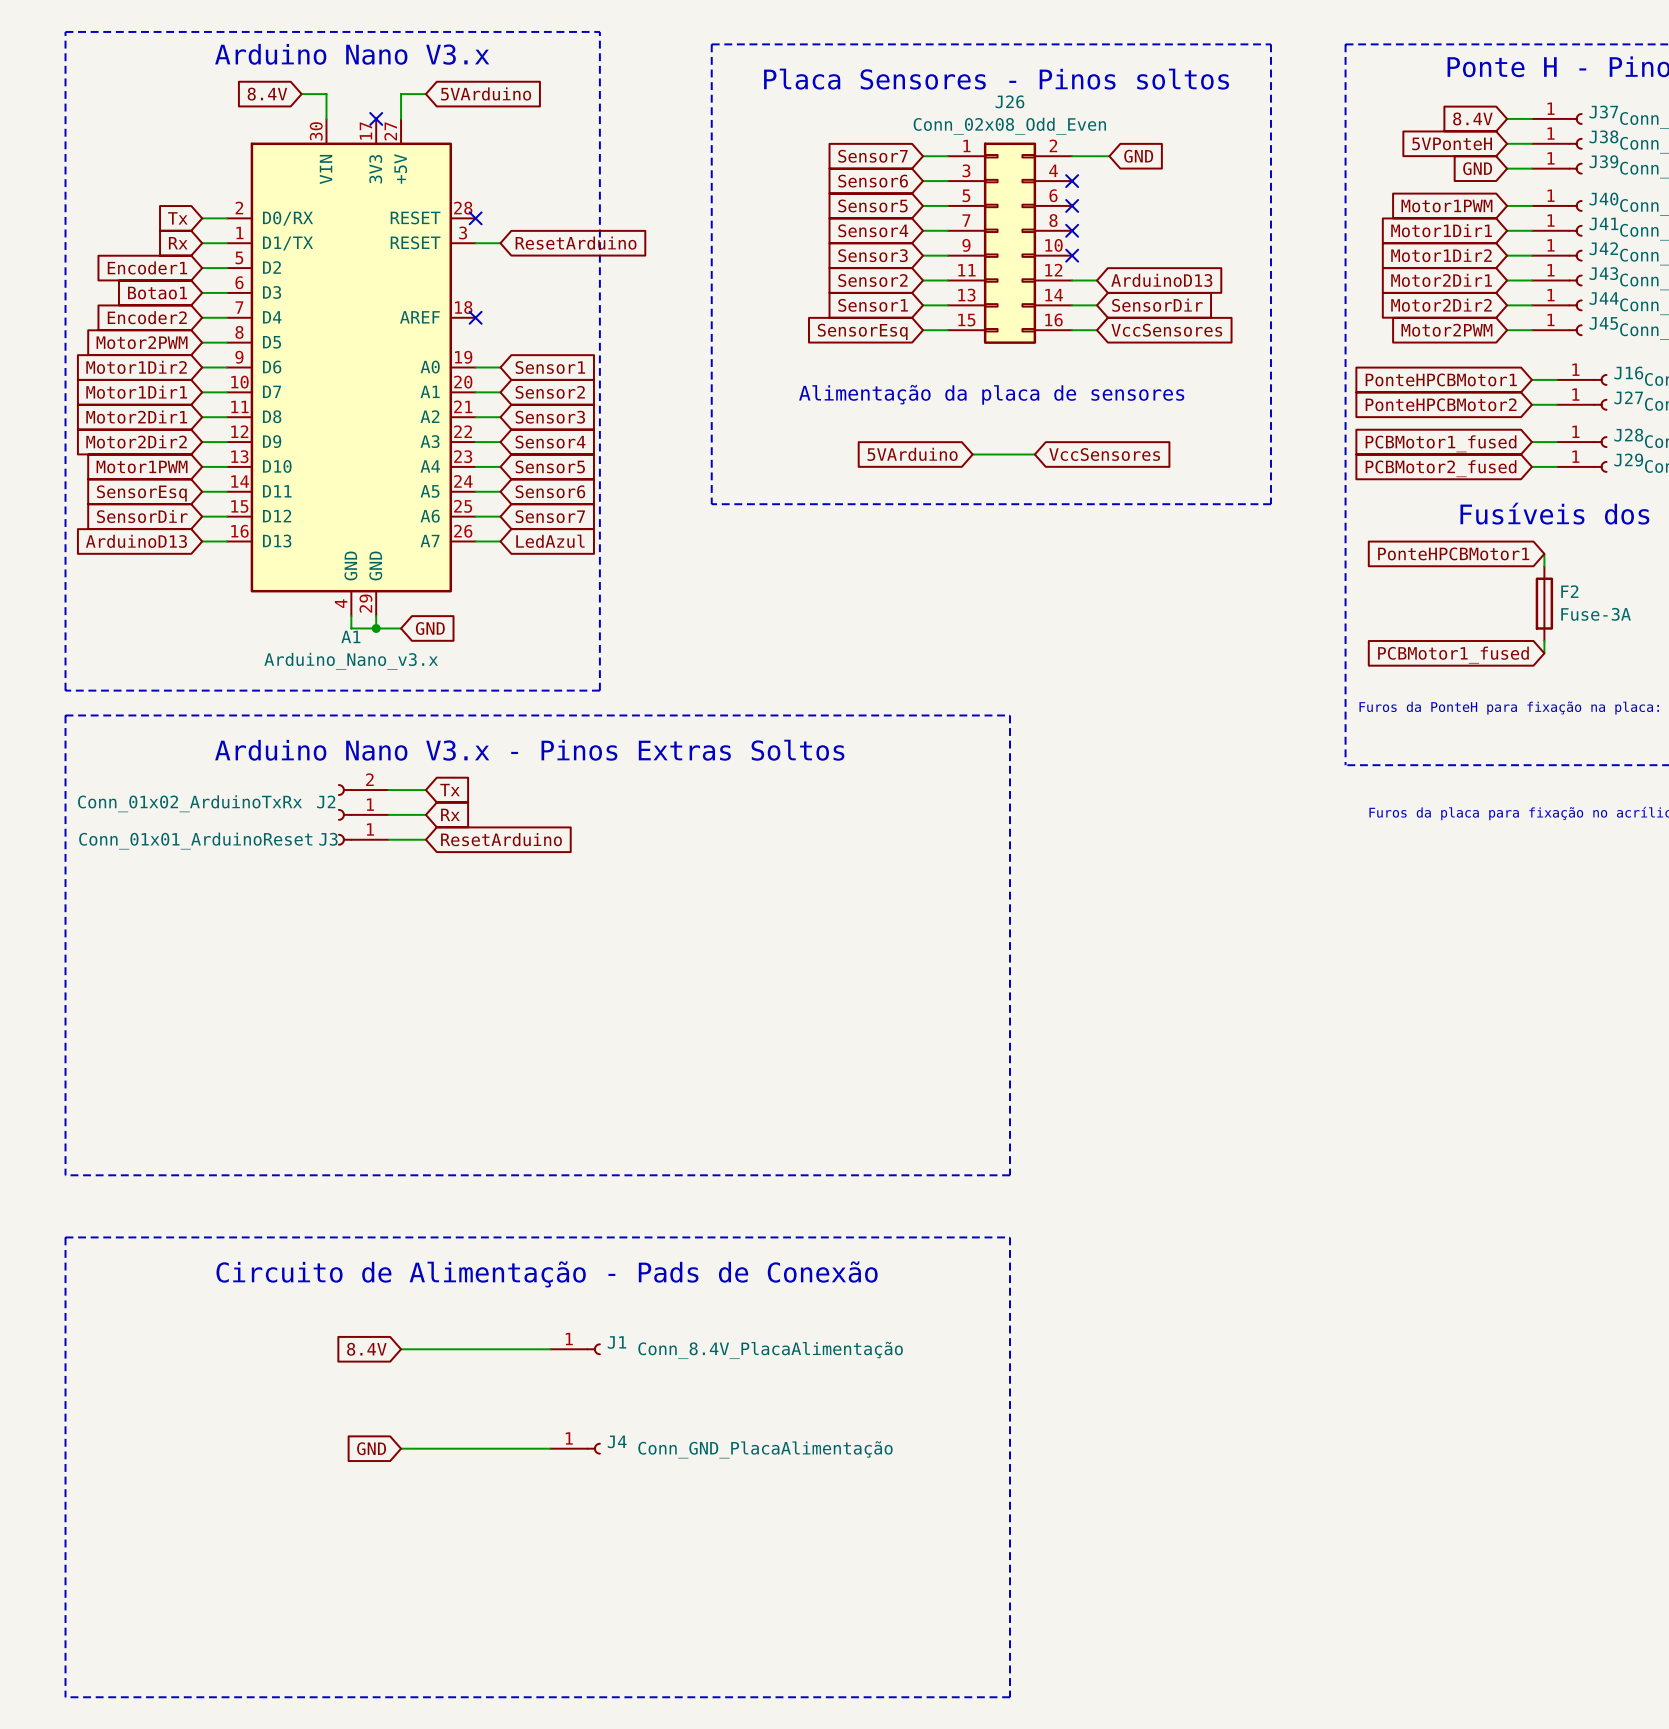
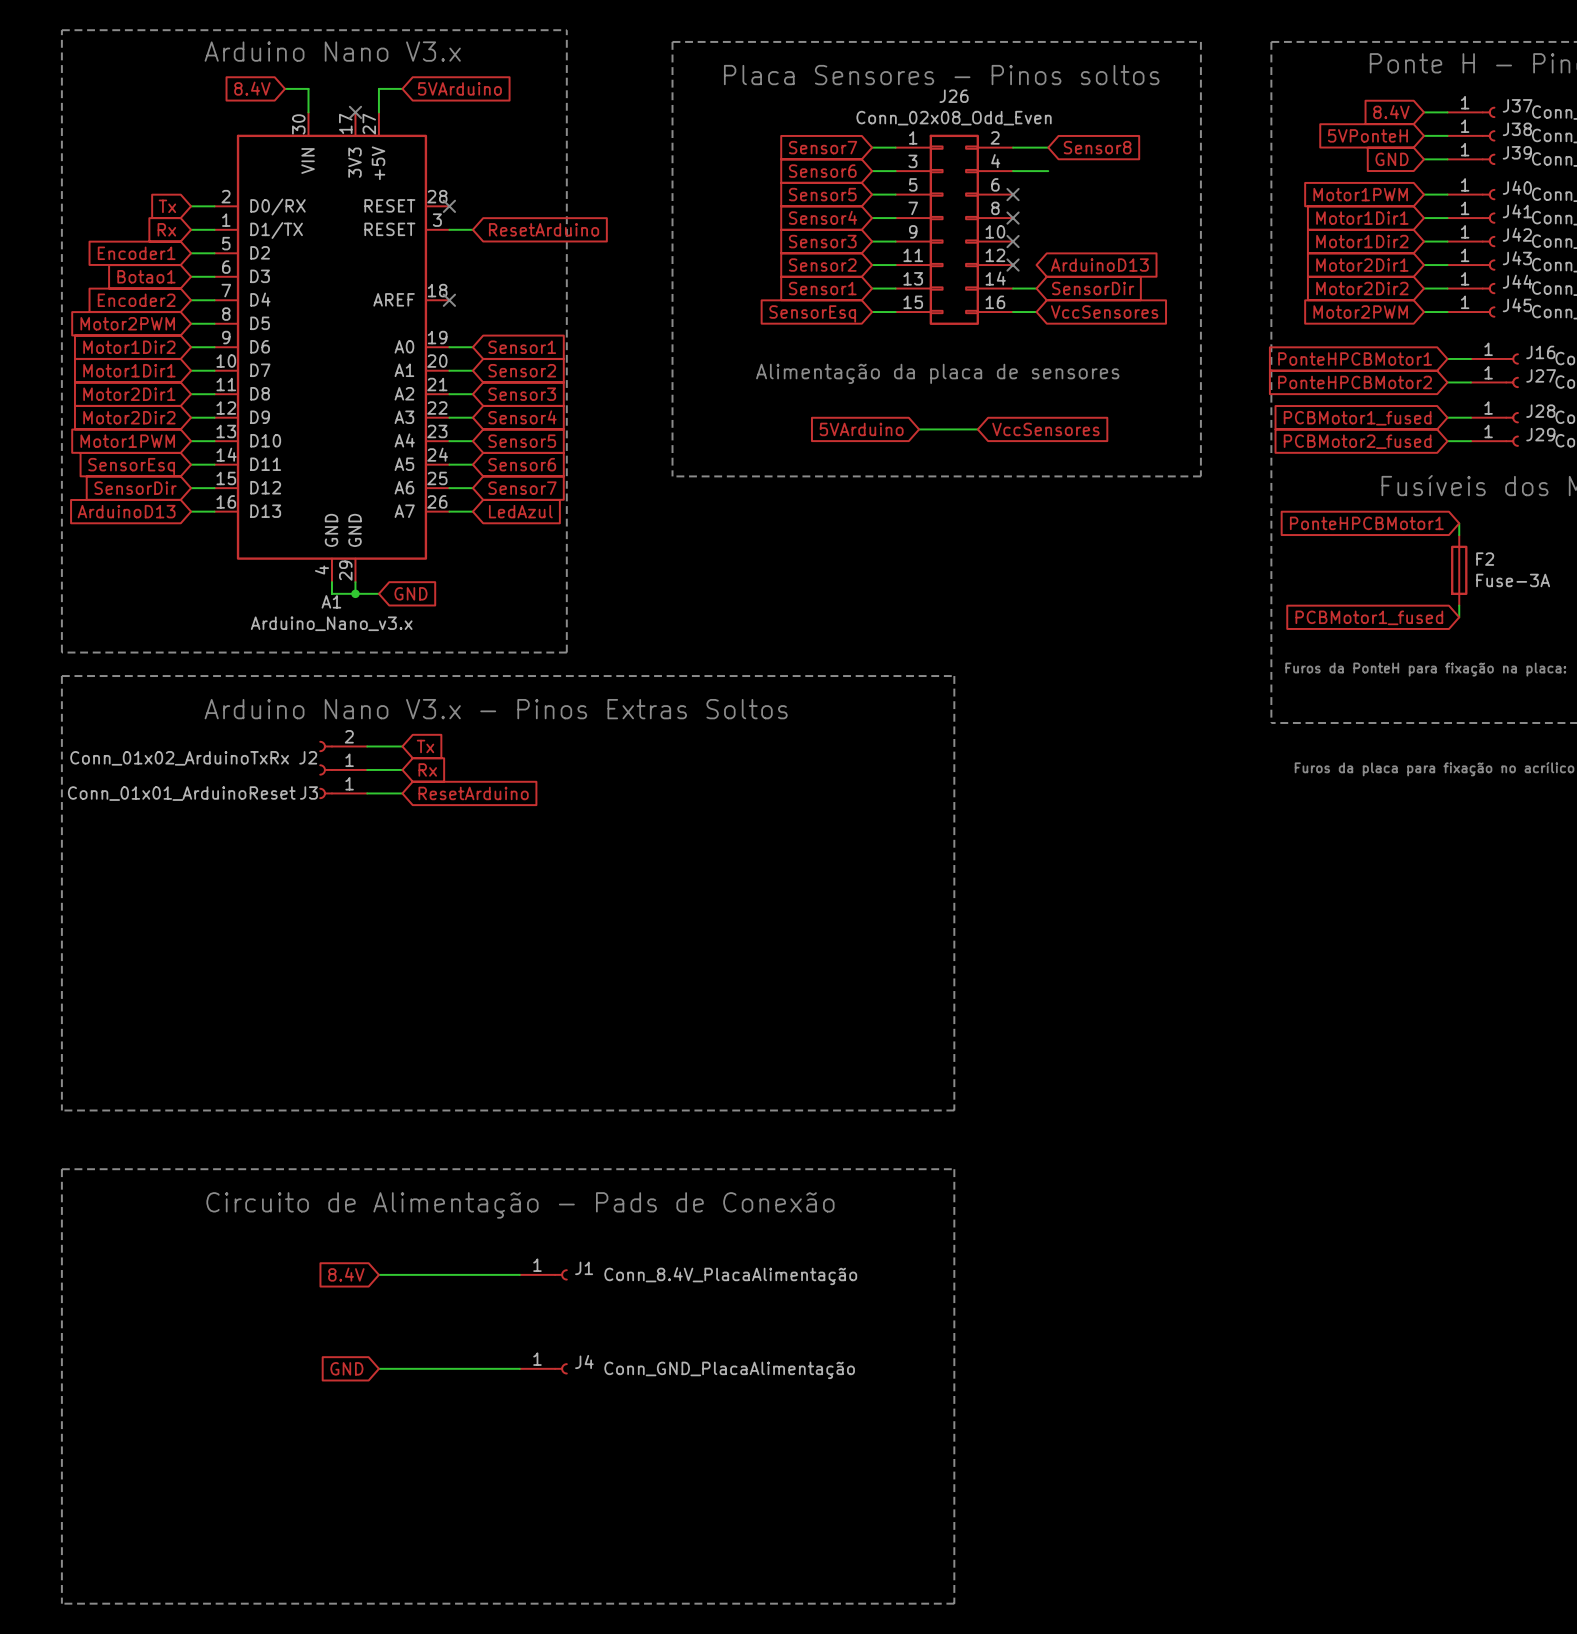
global label: GND (1138, 156) -> Sensor8 (1097, 147)
wire: none -> (1013, 171) (1048, 171)
no-connect mark: (1072, 181) -> none
wire: (1072, 280) (1097, 280) -> none
no-connect mark: none -> (1013, 265)

